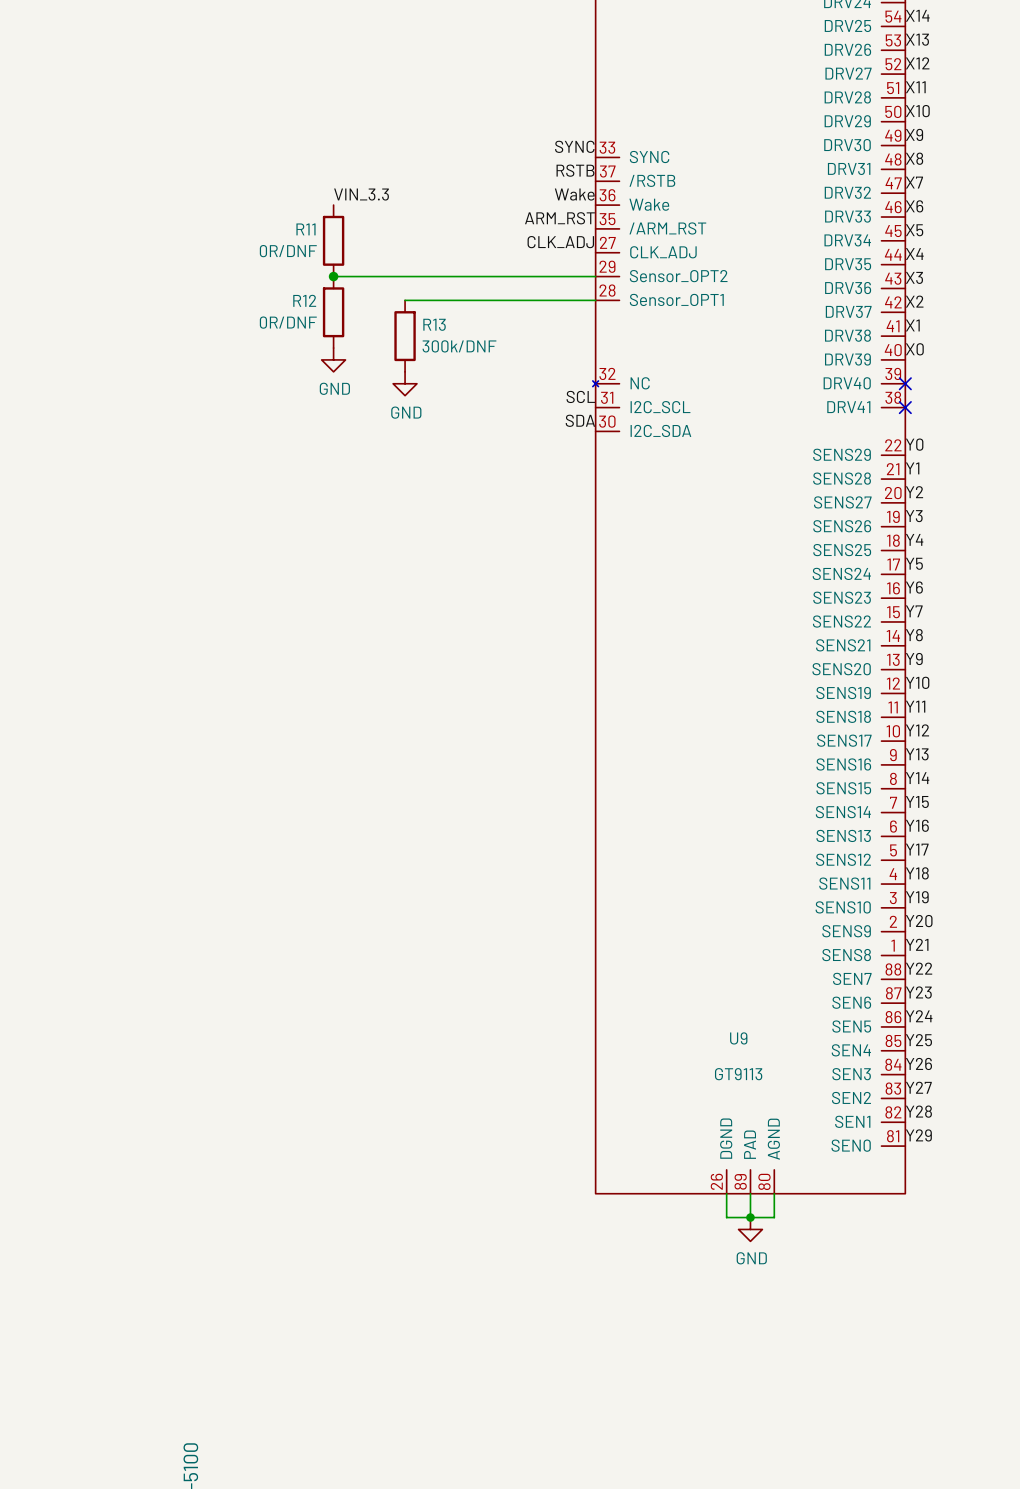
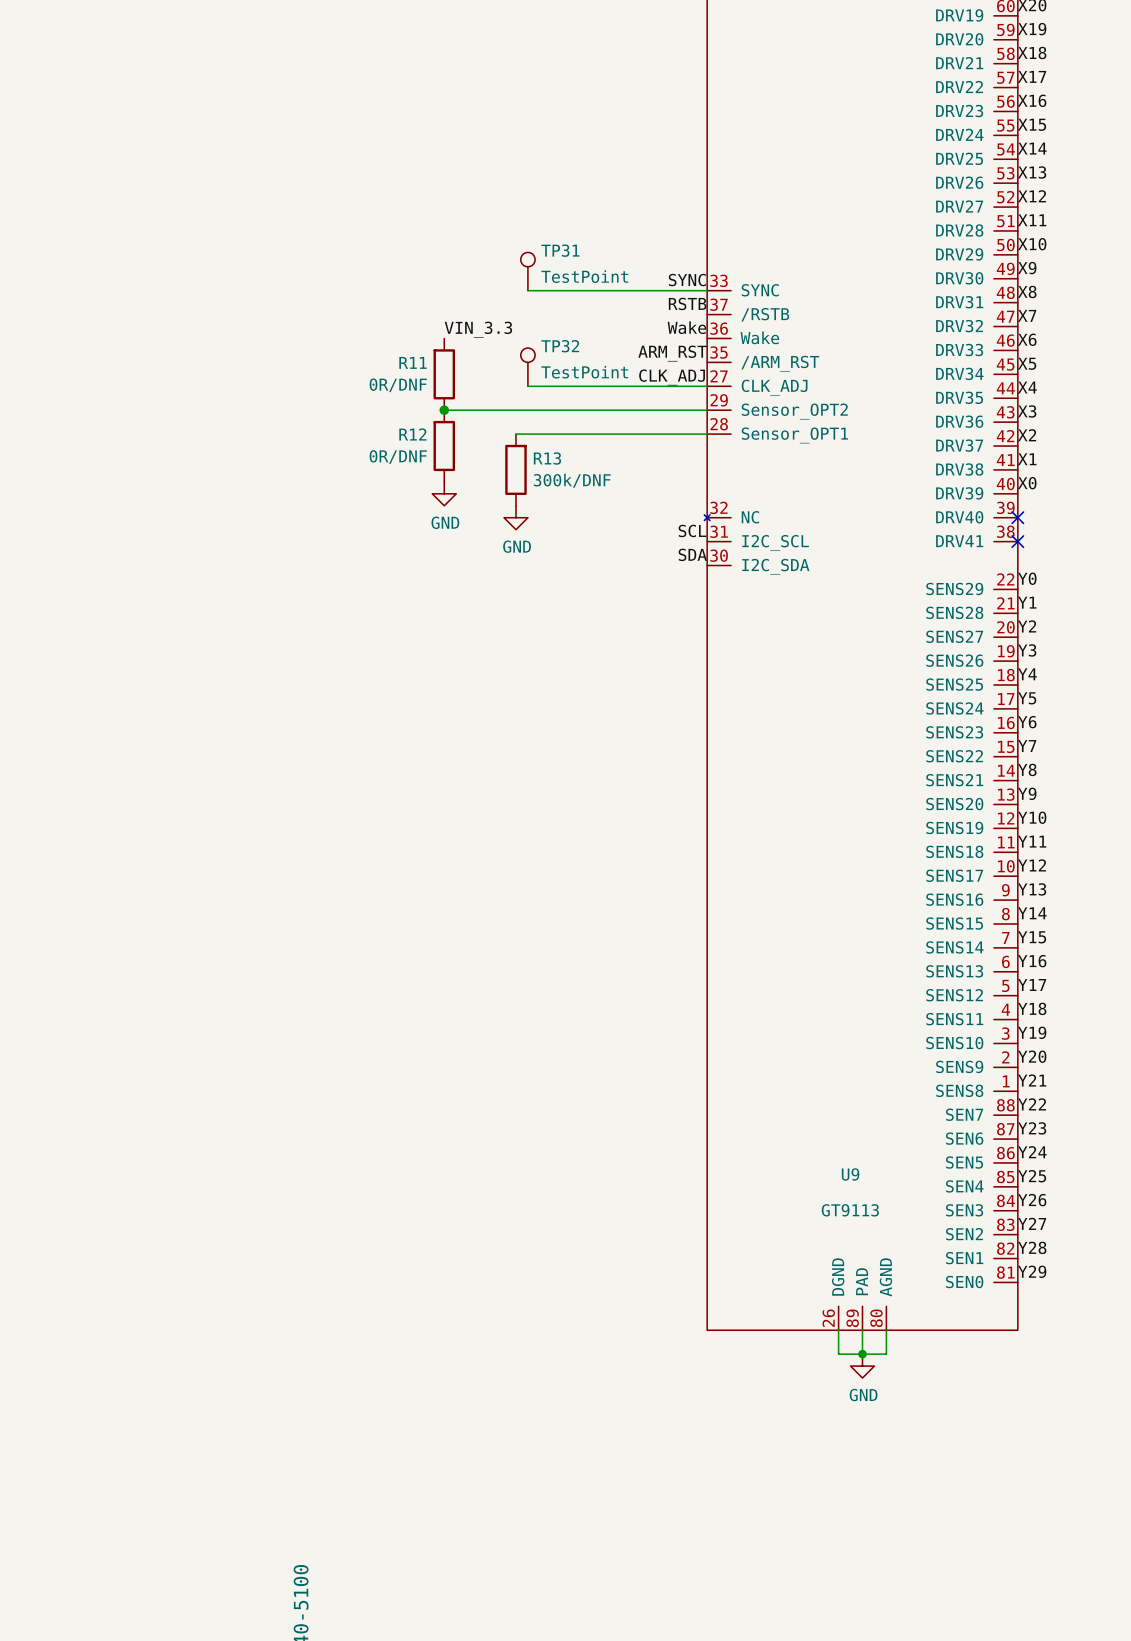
TP31: none -> TestPoint (527, 271)
wire: none -> (527, 290) (707, 290)
TP32: none -> TestPoint (527, 367)
wire: none -> (527, 386) (707, 386)

